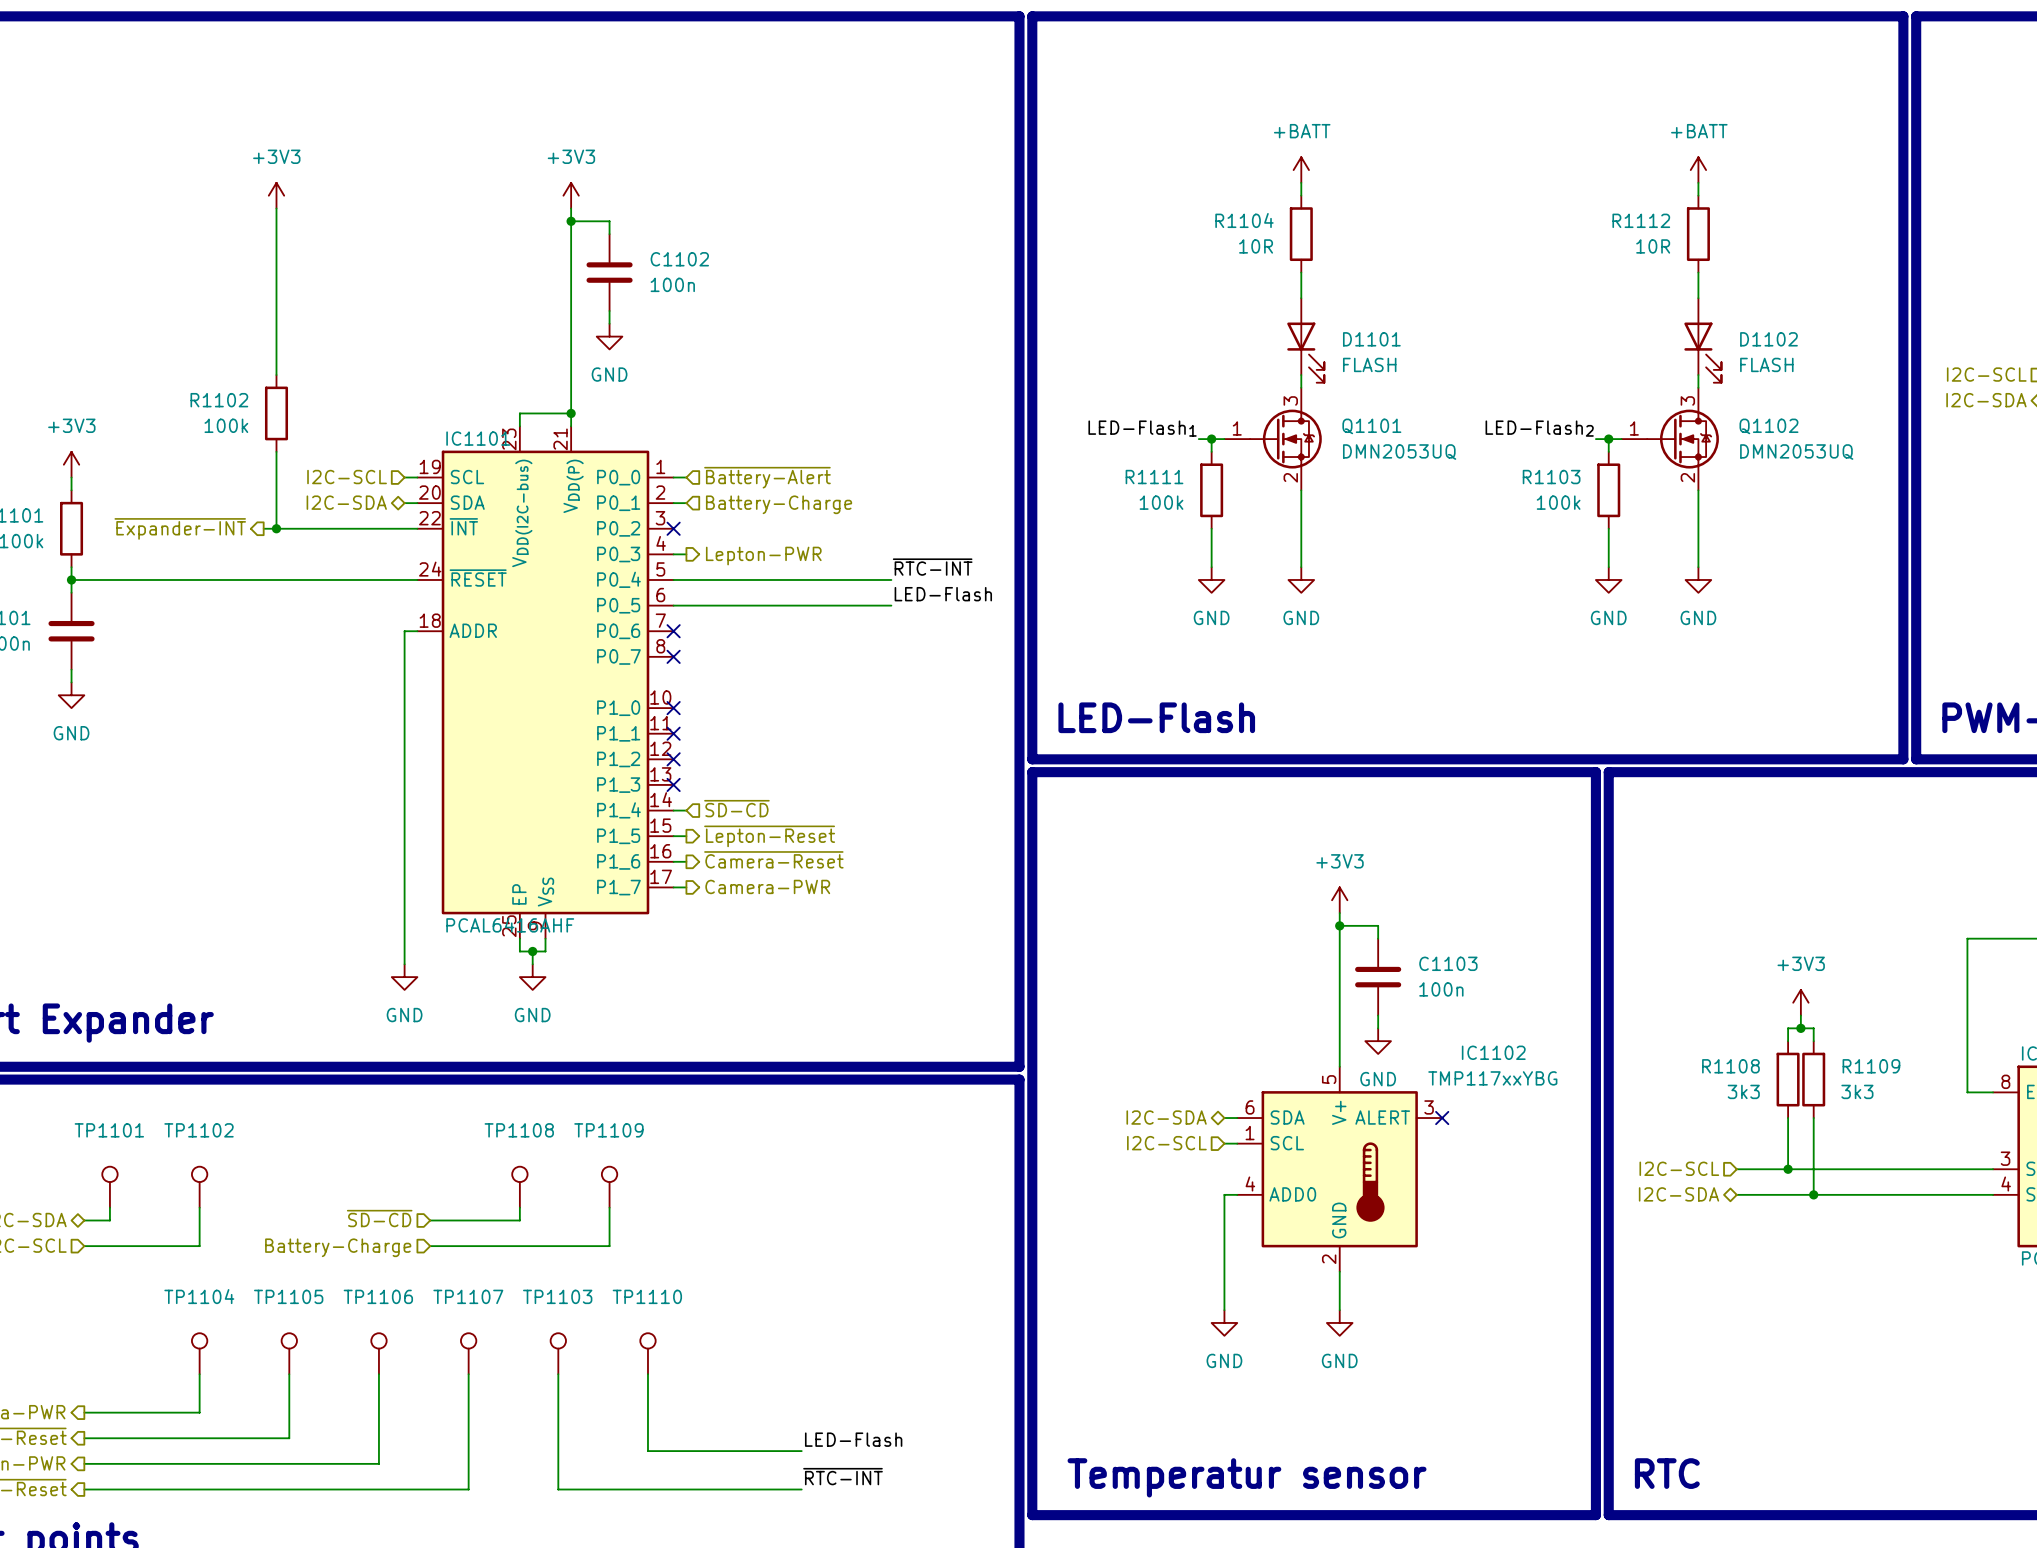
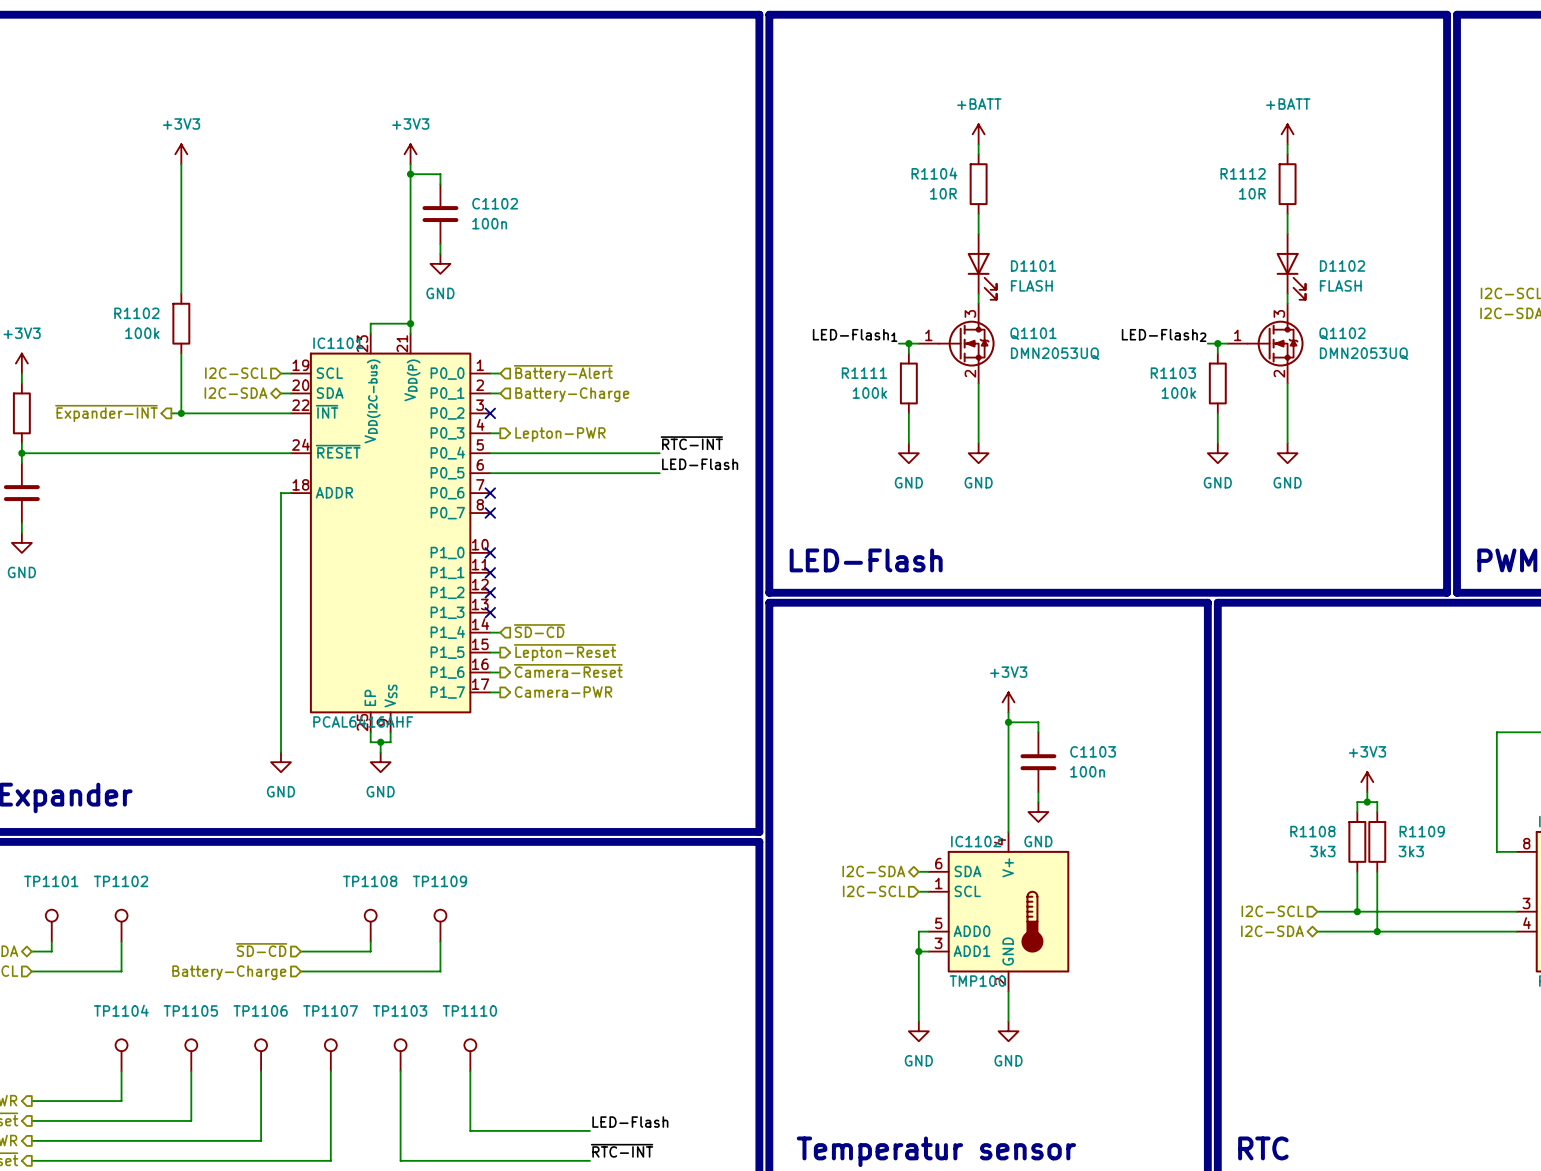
IC1102 name position: IC1102 (1493, 1052) -> IC1102 (976, 841)
IC1102 symbol: [1237, 1066, 1443, 1272] -> [928, 831, 1070, 992]
IC1102 value: TMP117xxYBG (1492, 1078) -> TMP100 (977, 981)
no-connect mark: (1442, 1118) -> none
wire: none -> (918, 951) (928, 951)
junction: none -> (918, 951)

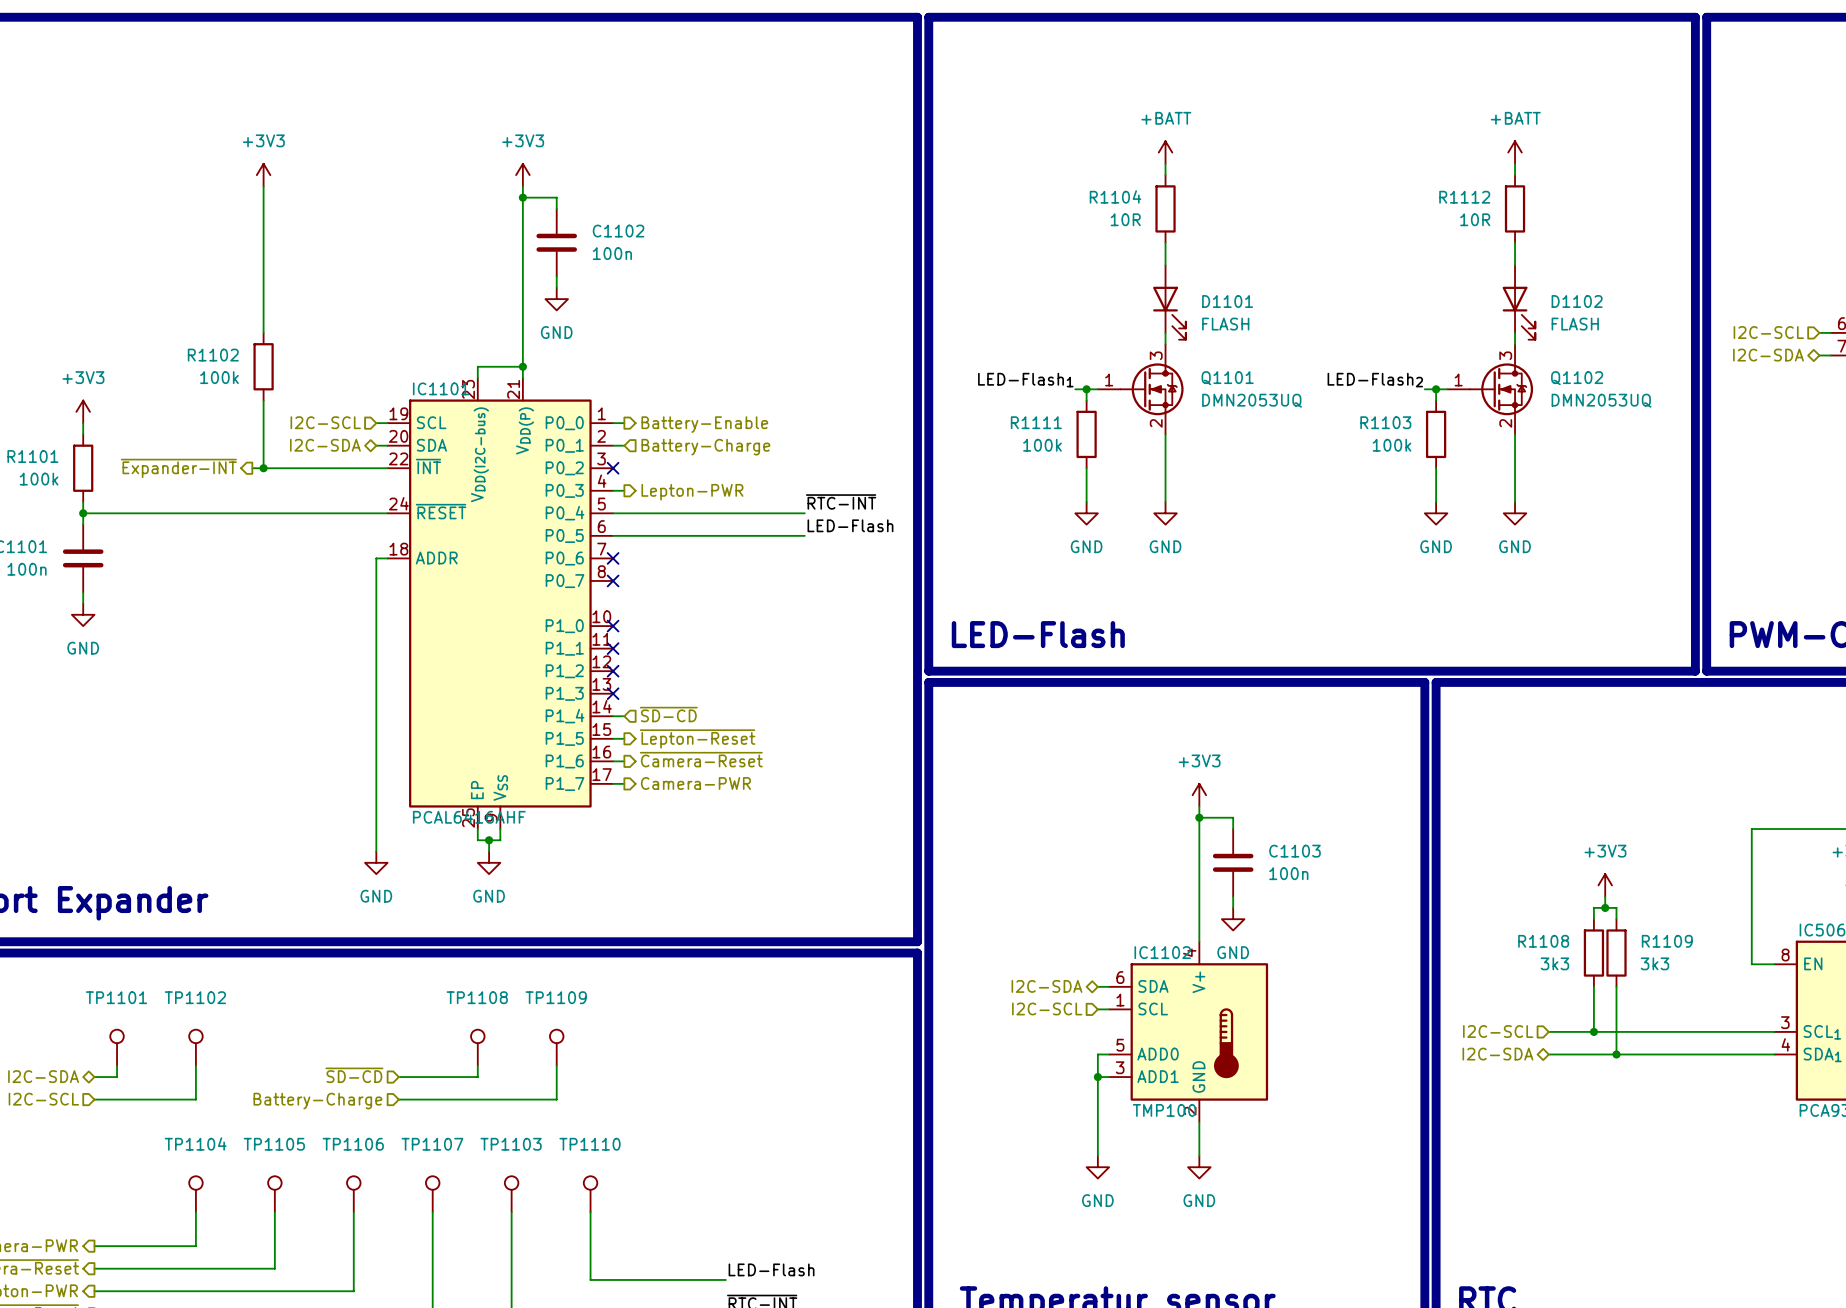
hierarchical label shape: input (563, 373) -> output (704, 424)
hierarchical label: ~{Battery-Alert} (563, 373) -> Battery-Enable (704, 424)

